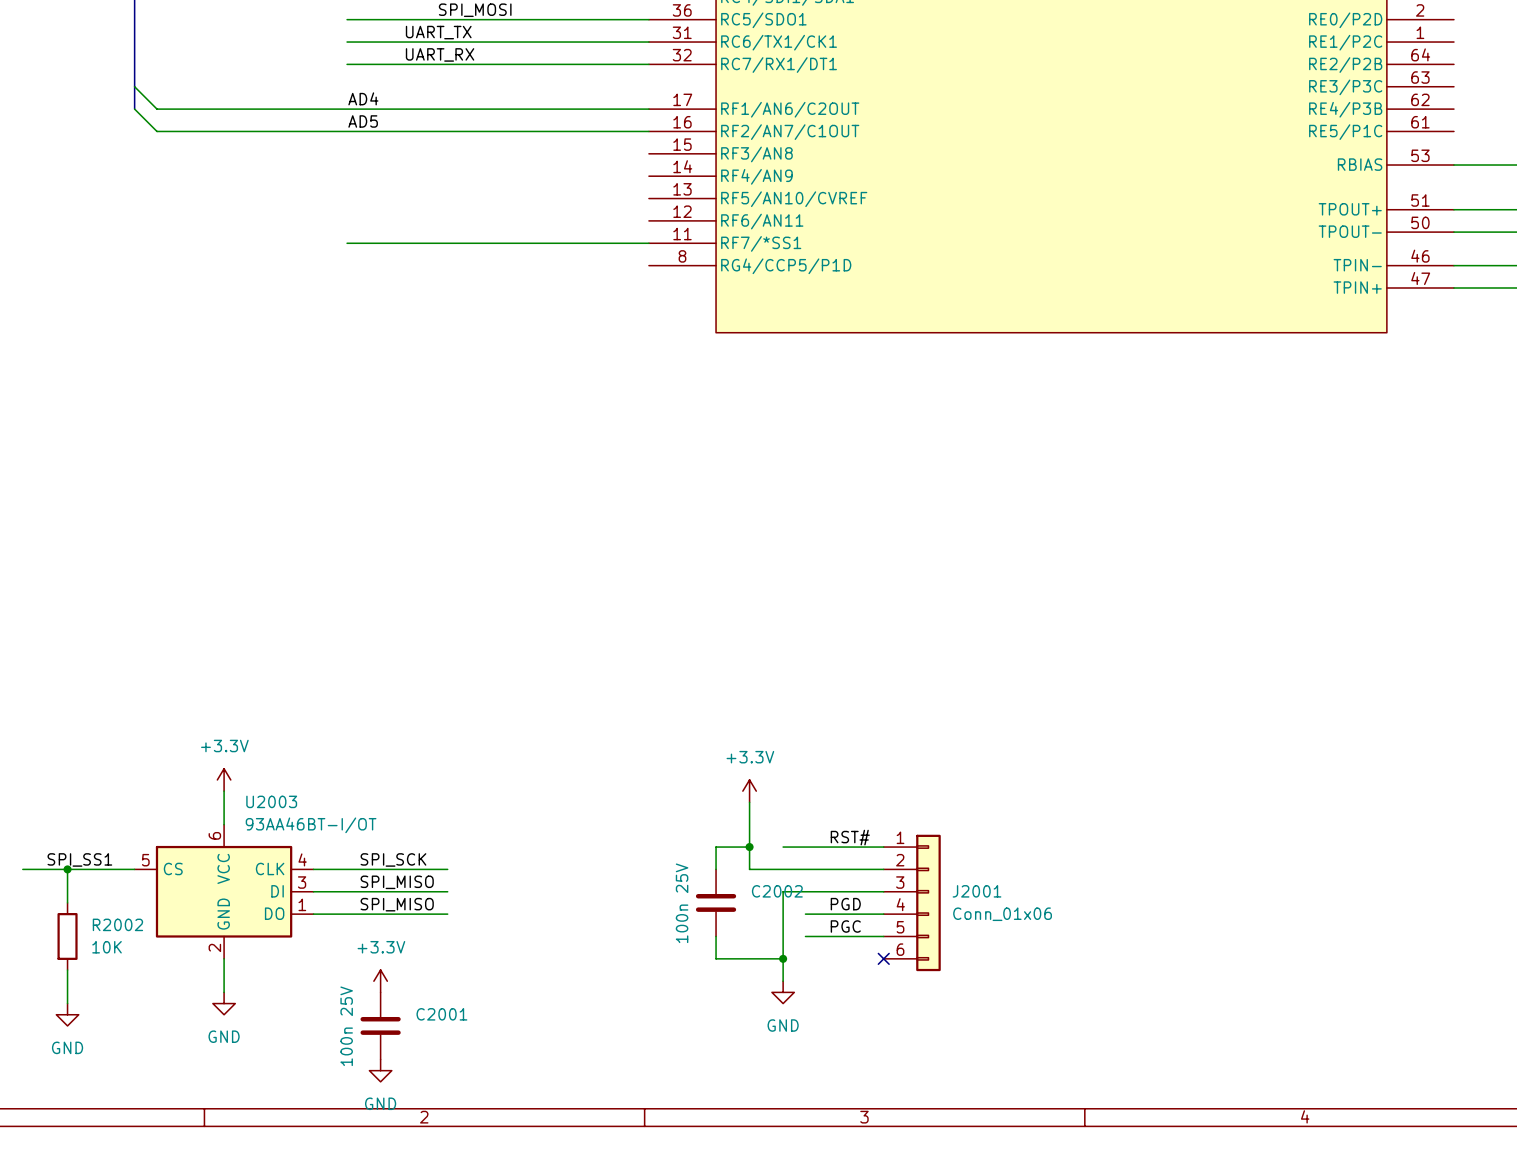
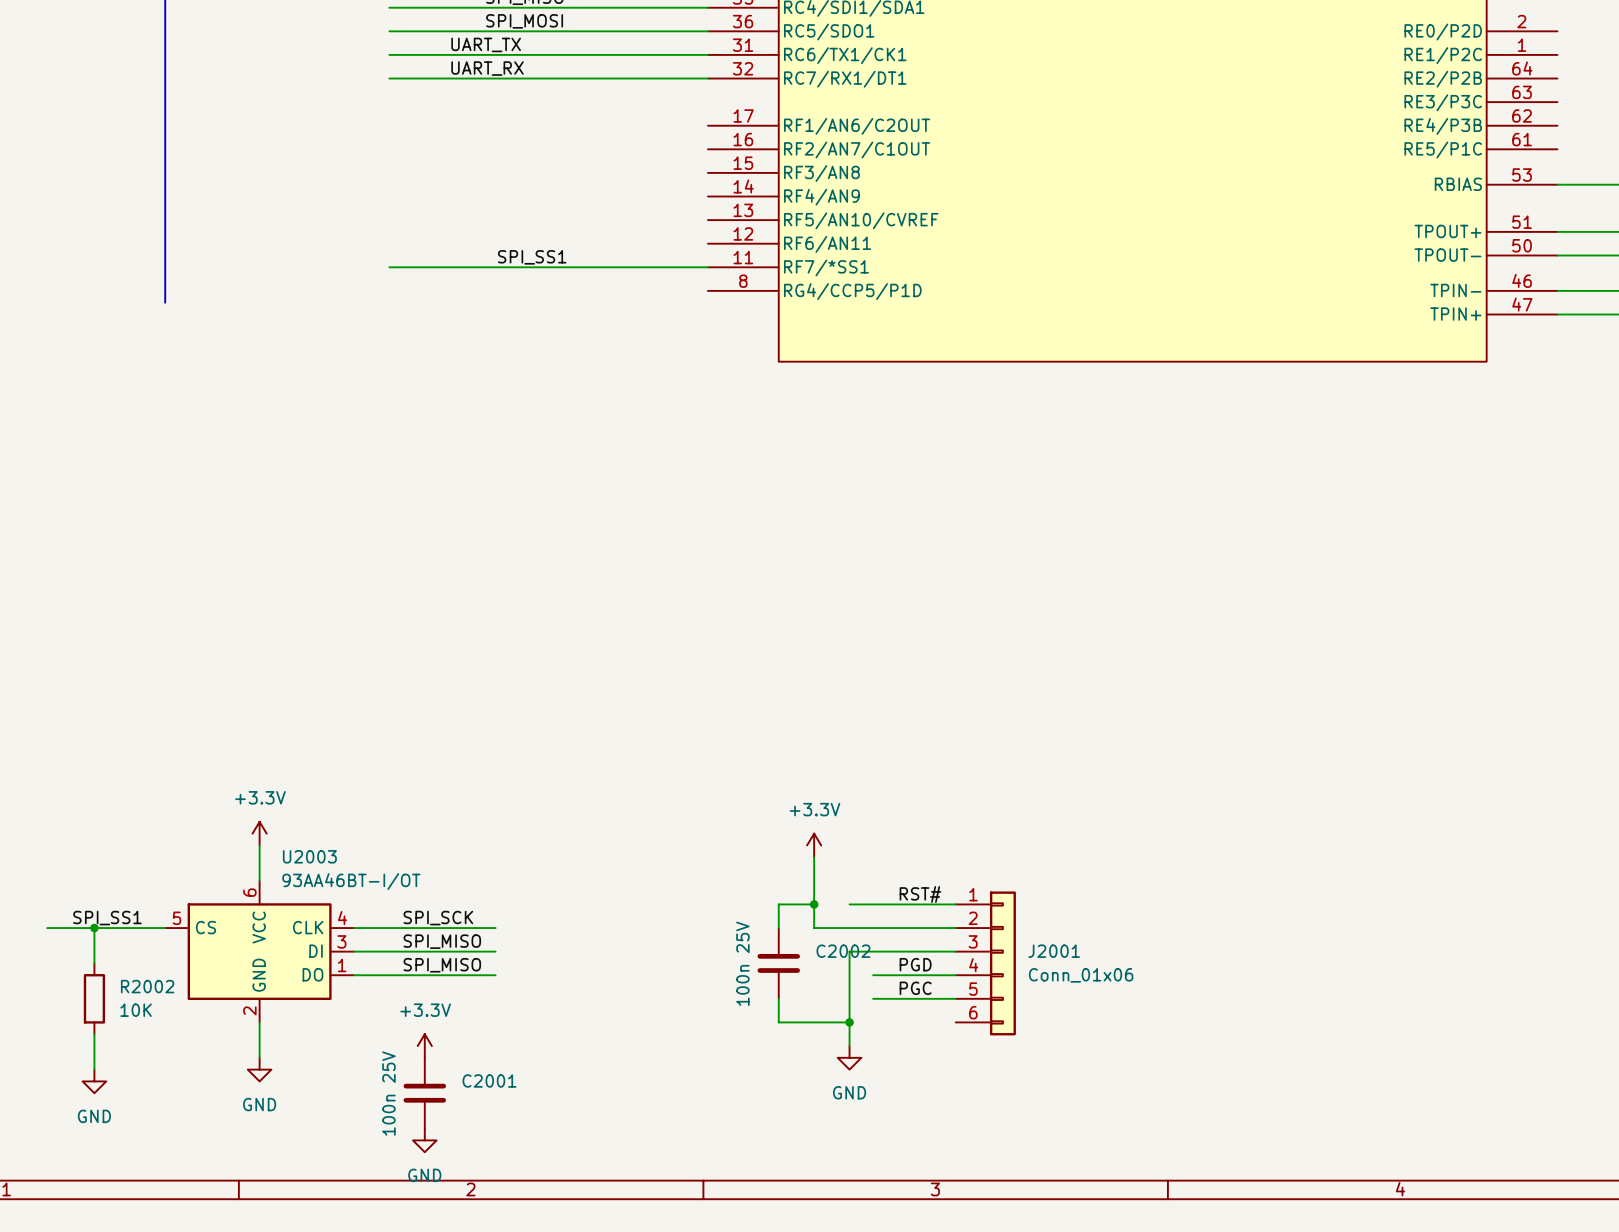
wire: (134, 86) (156, 109) (648, 109) -> none
label: AD4 (363, 98) -> none
wire: (134, 109) (156, 131) (648, 131) -> none
bus: none -> (165, 125) (165, 302)
label: AD5 (363, 121) -> none
label: none -> SPI_SS1 (532, 257)
no-connect mark: (883, 958) -> none

